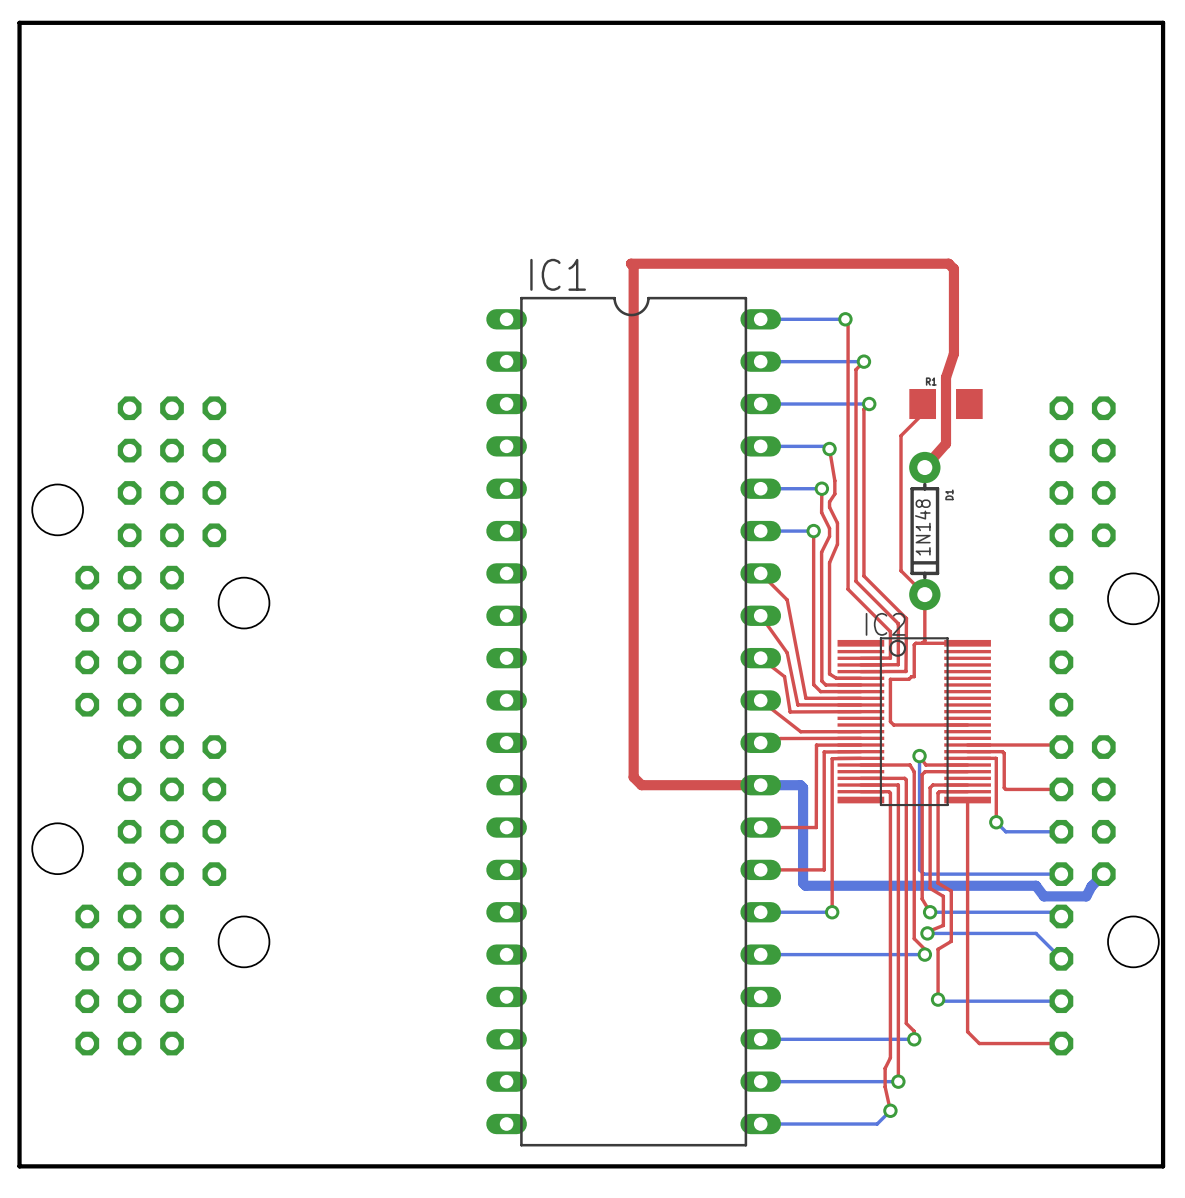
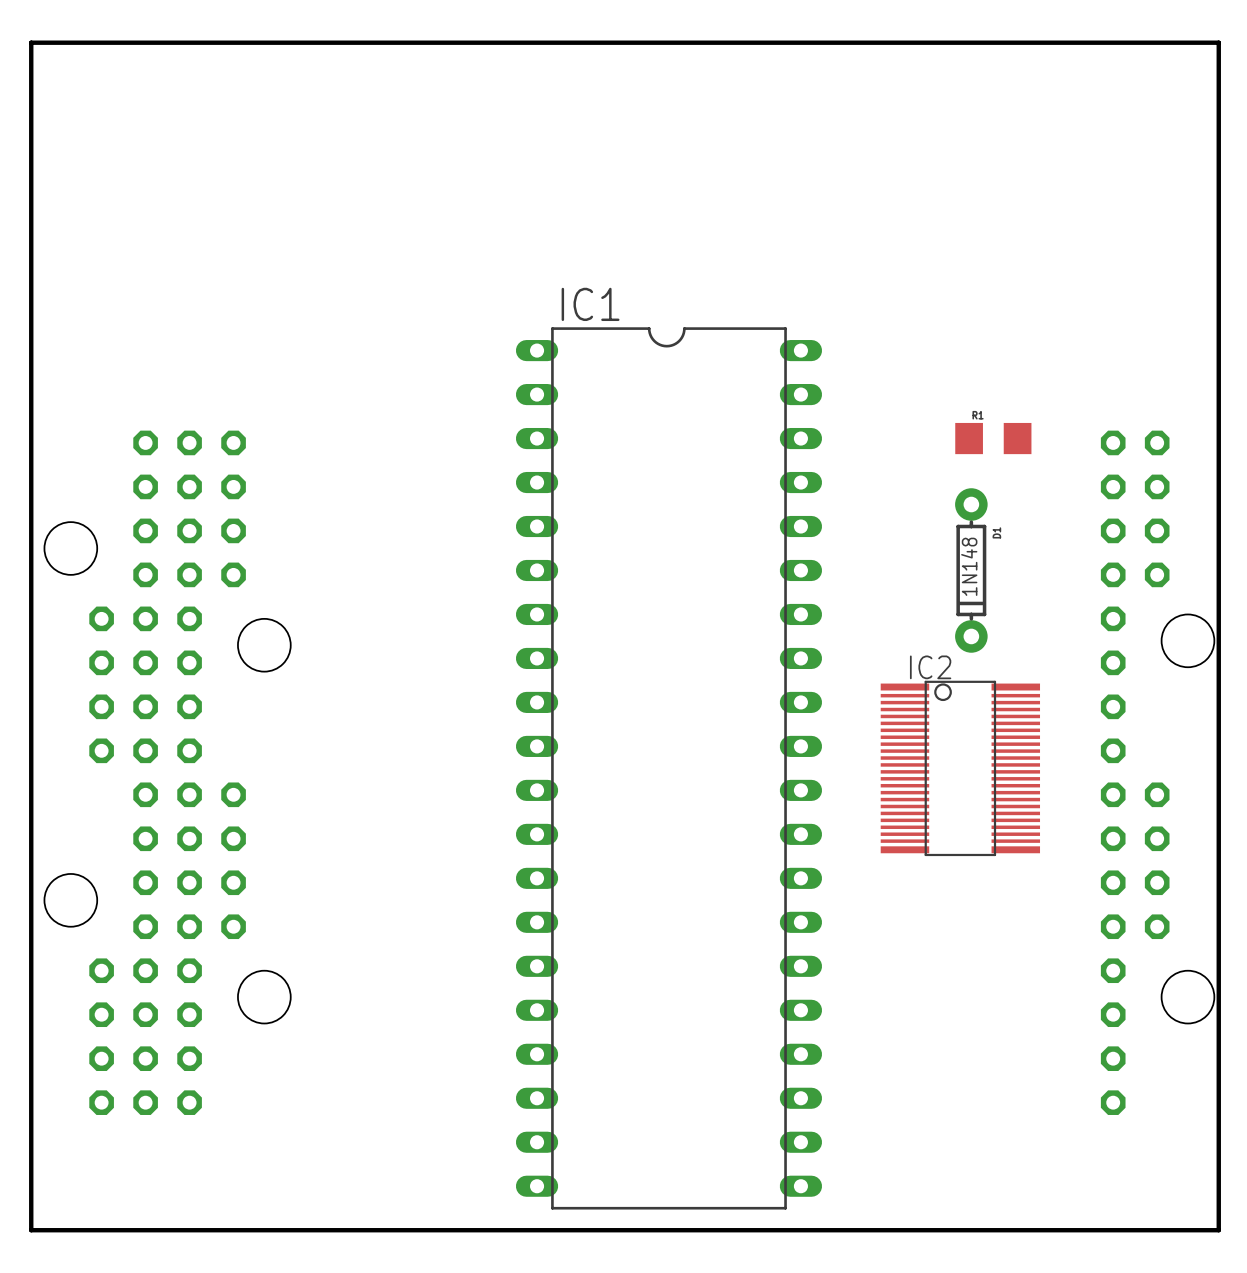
bottom track: (760, 319) (845, 319) -> none
top track: (845, 319) (848, 321) (848, 589) (890, 631) (890, 658) (860, 658) -> none
via: (845, 319) -> none
bottom track: (760, 361) (863, 361) -> none
top track: (863, 361) (856, 369) (856, 581) (898, 623) (898, 664) (860, 664) -> none
via: (863, 361) -> none
bottom track: (760, 404) (869, 404) -> none
top track: (869, 404) (863, 409) (863, 576) (906, 618) -> none
via: (869, 404) -> none
top track: (922, 404) (922, 414) (901, 435) (901, 570) (924, 594) (924, 640) (922, 643) -> none
bottom track: (760, 446) (826, 446) (829, 449) -> none
top track: (829, 449) (834, 480) (834, 494) (829, 501) (829, 507) (837, 523) (837, 544) (829, 562) (829, 674) (836, 678) (860, 678) -> none
via: (829, 449) -> none
top track: (924, 467) (946, 443) (946, 377) (953, 353) (953, 269) (948, 263) (631, 263) (633, 266) (633, 777) (641, 785) (760, 785) -> none
bottom track: (760, 488) (821, 488) -> none
top track: (821, 488) (821, 512) (829, 528) (829, 536) (821, 552) (821, 681) (825, 684) (860, 684) -> none
via: (821, 488) -> none
bottom track: (760, 531) (813, 531) -> none
top track: (813, 531) (813, 684) (820, 691) (860, 691) -> none
via: (813, 531) -> none
top track: (760, 573) (787, 599) (805, 698) (860, 698) -> none
top track: (760, 615) (787, 652) (797, 704) (860, 704) -> none
top track: (906, 618) (905, 671) (860, 671) -> none
top track: (967, 643) (915, 643) (914, 644) (914, 676) (908, 679) (890, 679) (890, 721) (893, 724) (967, 724) -> none
top track: (760, 658) (784, 676) (790, 711) (860, 711) -> none
top track: (760, 700) (800, 731) (860, 731) -> none
top track: (860, 738) (780, 738) (760, 742) -> none
top track: (860, 745) (816, 745) (816, 827) (760, 827) -> none
top track: (967, 745) (1059, 745) (1061, 747) -> none
top track: (860, 751) (824, 752) (824, 869) (760, 869) -> none
top track: (967, 751) (1002, 751) (1004, 753) (1004, 787) (1005, 789) (1061, 789) -> none
top track: (919, 756) (925, 765) (967, 765) -> none
bottom track: (919, 756) (919, 869) (923, 874) (1061, 874) -> none
via: (919, 756) -> none
top track: (860, 758) (832, 758) (832, 912) -> none
top track: (967, 758) (996, 758) (996, 822) -> none
top track: (860, 765) (909, 765) (914, 771) (914, 938) (924, 949) (924, 954) -> none
top track: (967, 771) (925, 771) (922, 774) (922, 899) (930, 912) -> none
top track: (860, 778) (906, 779) (906, 1023) (914, 1031) (914, 1039) -> none
bottom track: (760, 785) (800, 785) (803, 787) (803, 883) (805, 885) (1036, 885) (1043, 896) (1086, 896) (1091, 886) (1103, 874) -> none
top track: (860, 785) (898, 785) -> none
top track: (898, 785) (898, 1081) -> none
top track: (967, 785) (932, 785) (930, 787) (930, 888) (943, 896) (943, 925) (927, 933) -> none
top track: (860, 791) (890, 793) (890, 1057) (885, 1068) (885, 1086) (890, 1110) -> none
top track: (967, 791) (938, 793) (938, 883) (951, 891) (951, 941) (938, 949) (938, 999) -> none
top track: (967, 800) (967, 1031) (979, 1043) (1061, 1043) -> none
bottom track: (996, 822) (1005, 831) (1061, 831) -> none
via: (996, 822) -> none
bottom track: (760, 912) (832, 912) -> none
via: (832, 912) -> none
bottom track: (930, 912) (1057, 912) (1061, 916) -> none
via: (930, 912) -> none
bottom track: (927, 933) (1036, 933) (1061, 958) -> none
via: (927, 933) -> none
bottom track: (760, 954) (924, 954) -> none
via: (924, 954) -> none
bottom track: (938, 999) (939, 1001) (1061, 1001) -> none
via: (938, 999) -> none
bottom track: (760, 1039) (914, 1039) -> none
via: (914, 1039) -> none
bottom track: (760, 1081) (898, 1081) -> none
via: (898, 1081) -> none
bottom track: (890, 1110) (877, 1124) (760, 1124) -> none
via: (890, 1110) -> none

